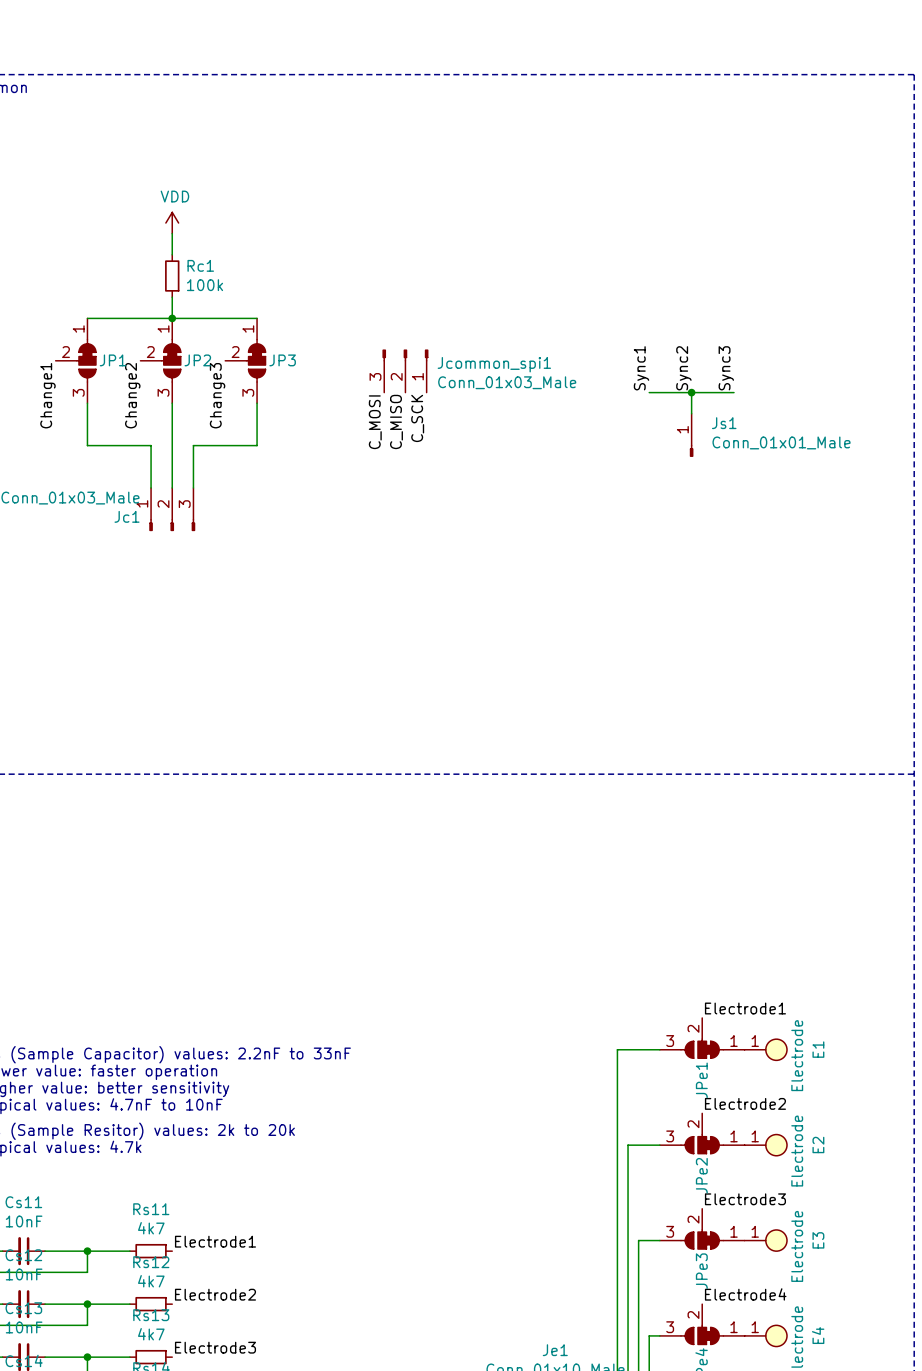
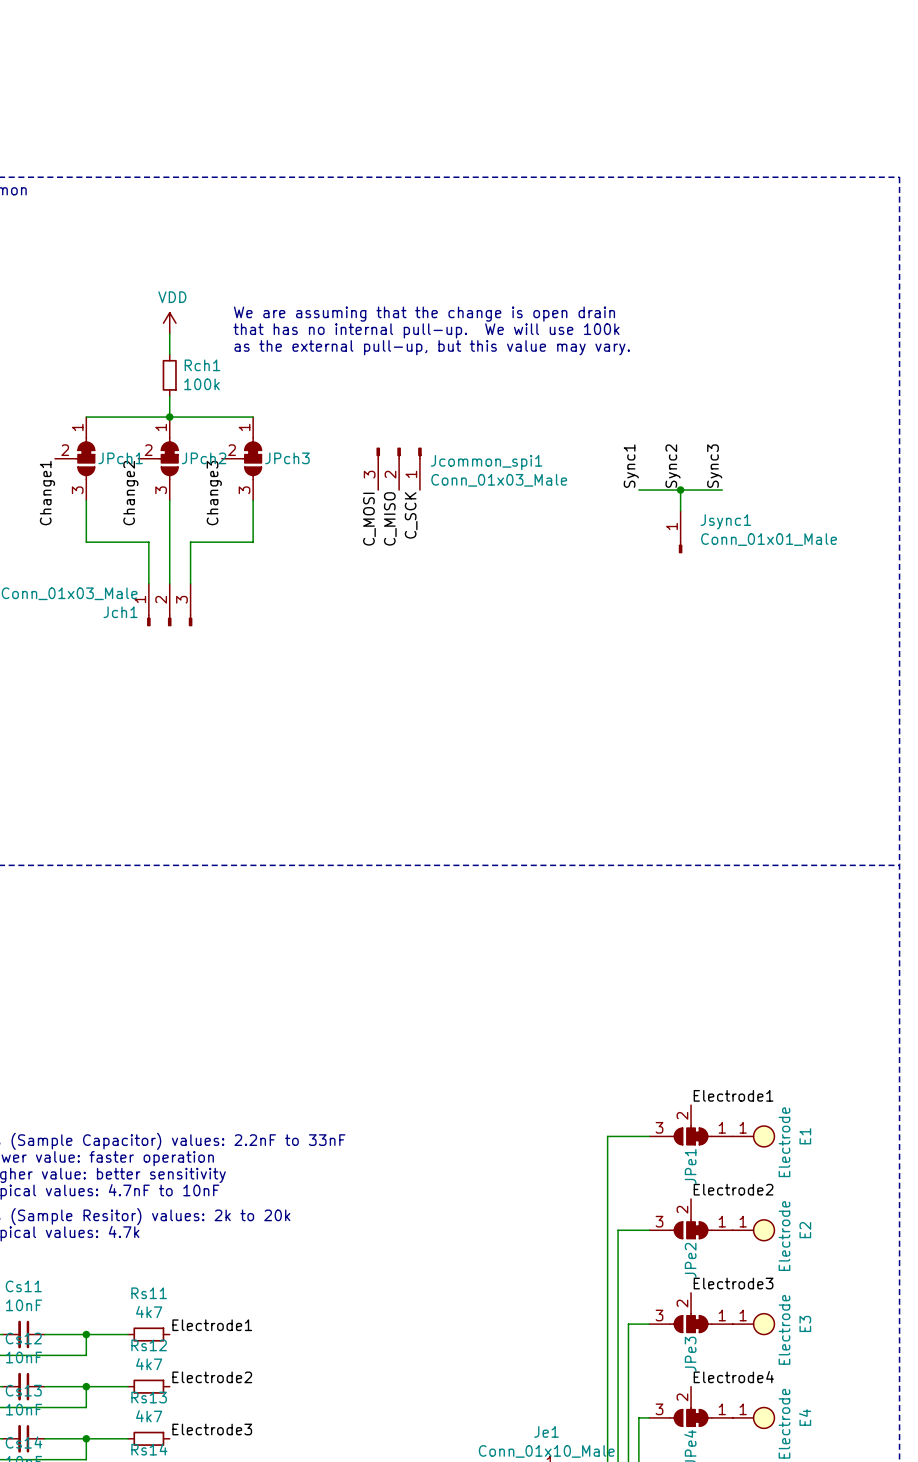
text: none -> We are assuming that the change is open drain (424, 314)
text: none -> that has no internal pull-up. We will use 100k (426, 330)
text: none -> as the external pull-up, but this value may vary. (432, 347)
Rc1 name: Rc1 (200, 265) -> Rch1 (202, 365)
JP1 name: JP1 (113, 360) -> JPch1 (120, 458)
JP2 name: JP2 (197, 360) -> JPch2 (204, 458)
JP3 name: JP3 (282, 360) -> JPch3 (287, 458)
Js1 name: Js1 (724, 423) -> Jsync1 (725, 521)
Jc1 name: Jc1 (127, 516) -> Jch1 (120, 612)

